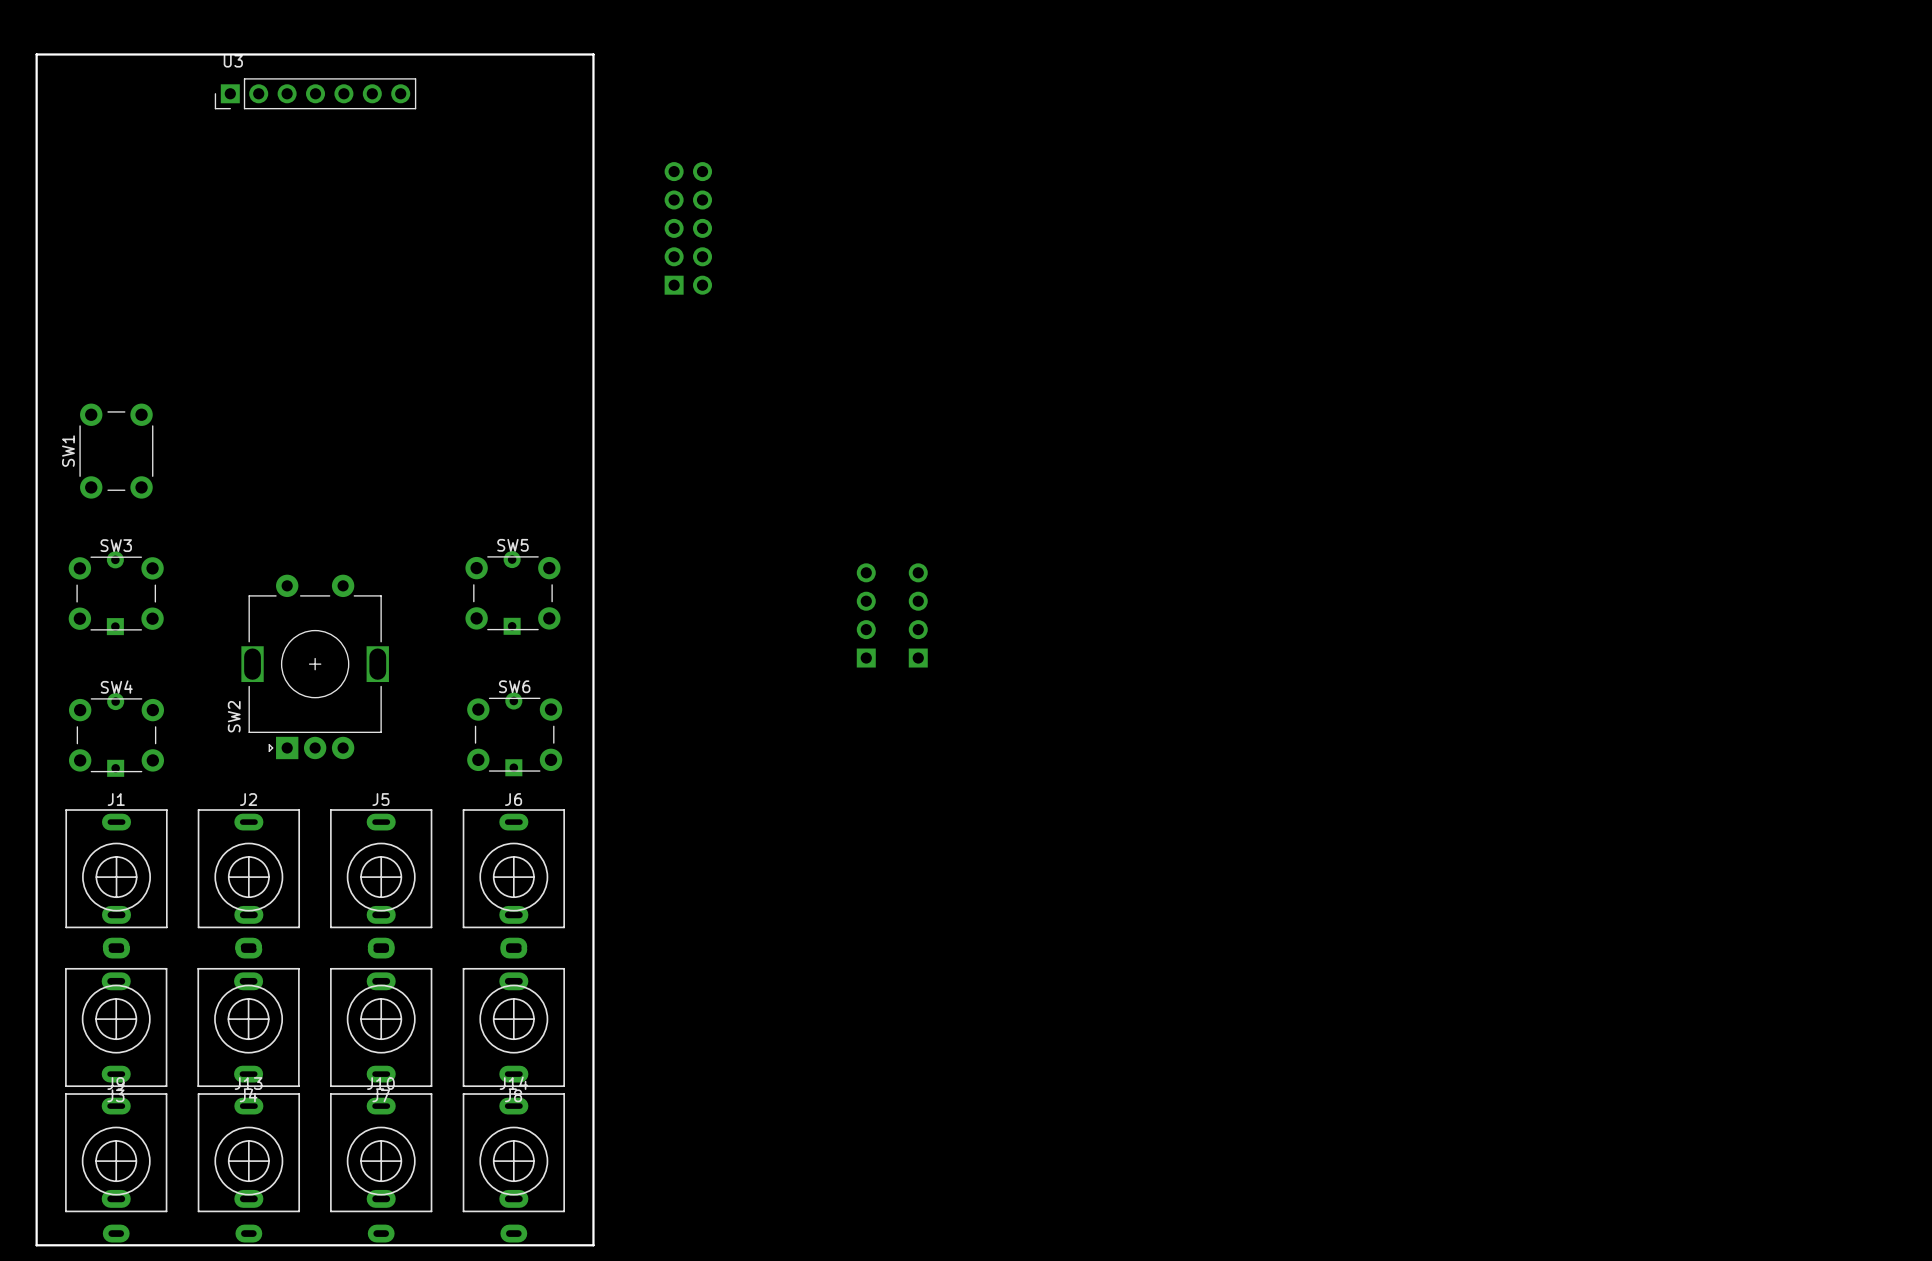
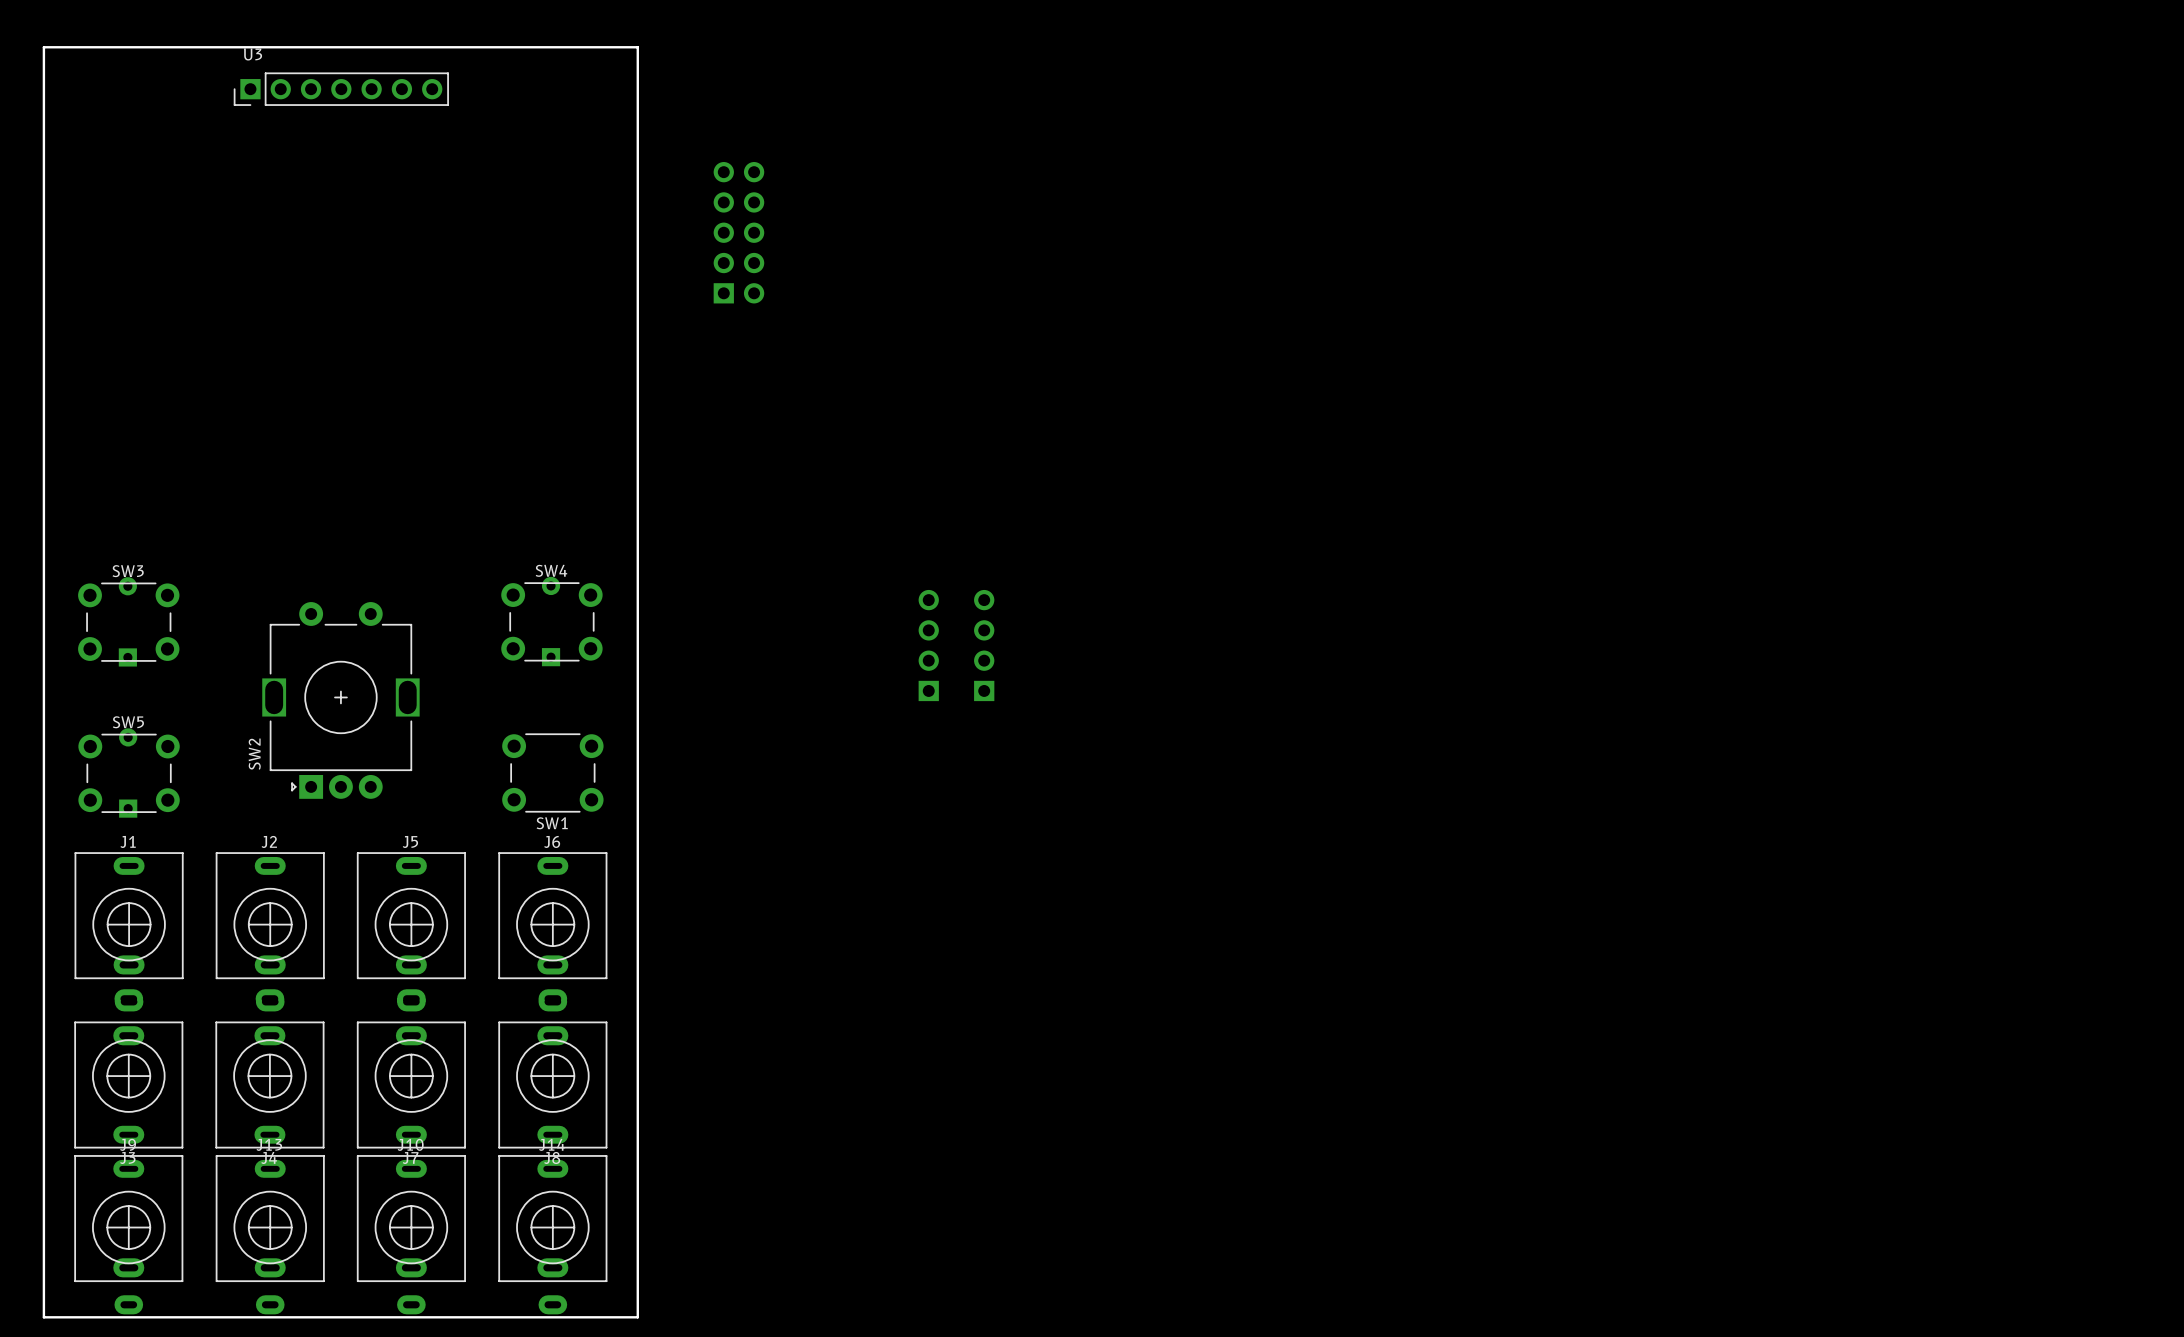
SW1 name position: SW1 (68, 451) -> SW1 (552, 823)
SW1 rotation: 0° (116, 451) -> 90° clockwise (552, 772)
SW1 position: (116, 451) -> (552, 772)
SW5 name: SW5 (512, 545) -> SW4 (551, 570)
SW4 name: SW4 (116, 687) -> SW5 (128, 722)
SW6: (514, 734) -> none

